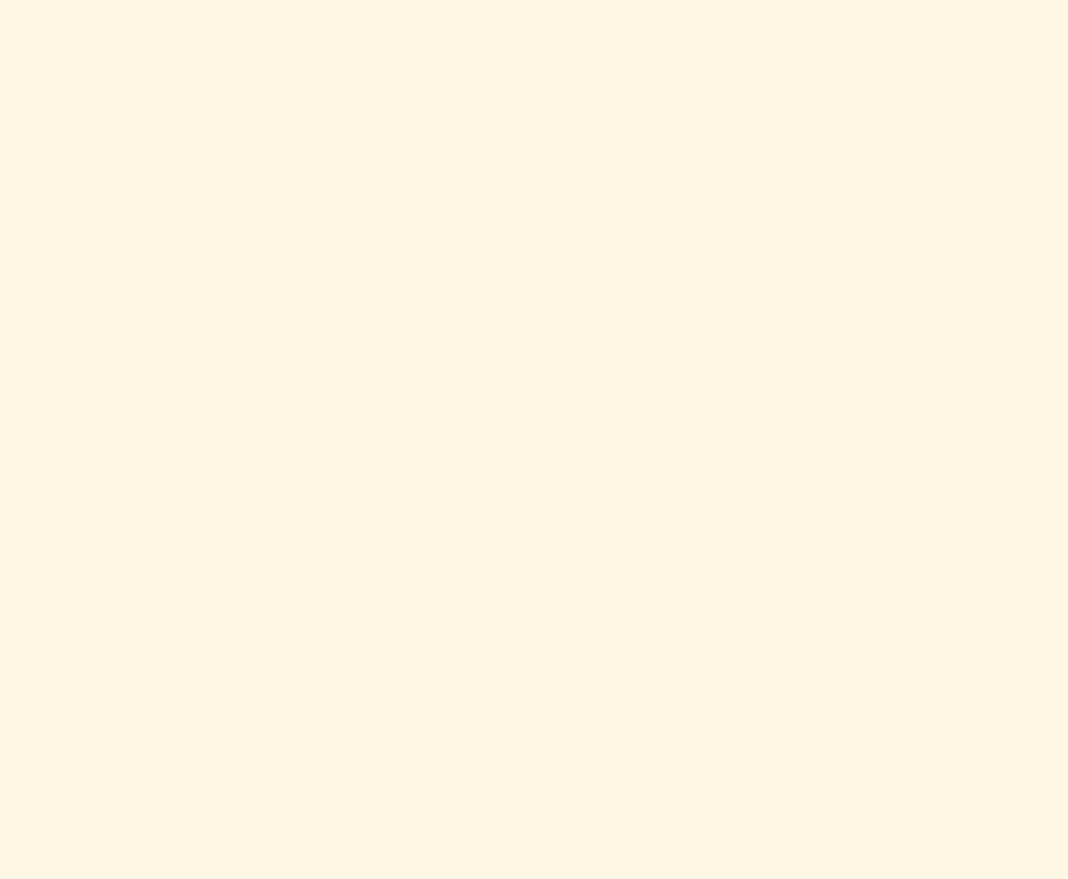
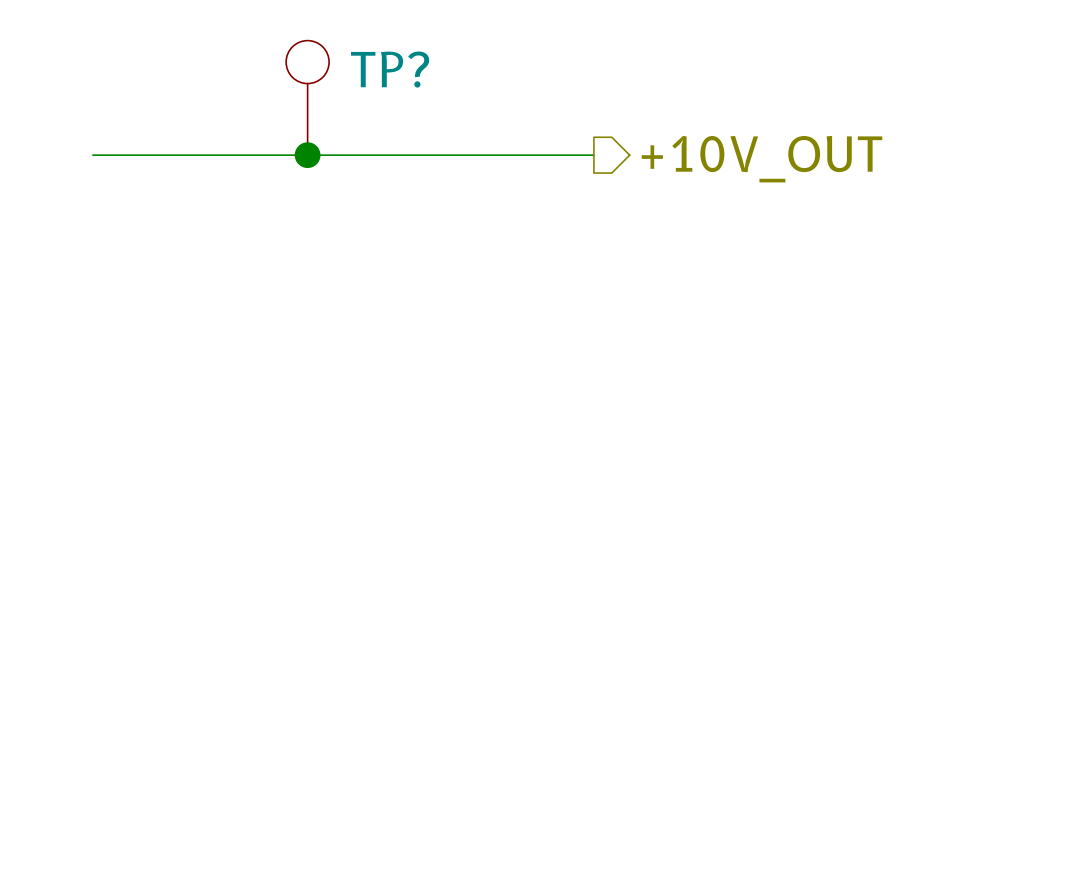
TP?: none -> (307, 97)
wire: none -> (92, 155) (593, 155)
junction: none -> (307, 155)
hierarchical label: none -> +10V_OUT (761, 159)

